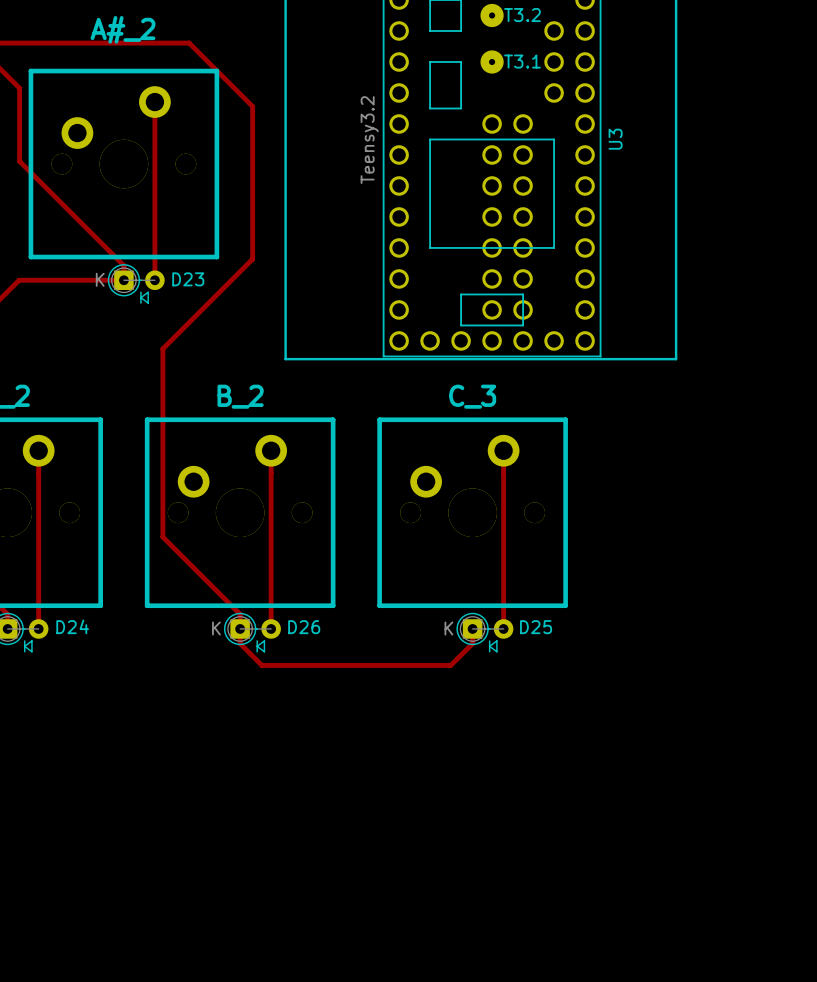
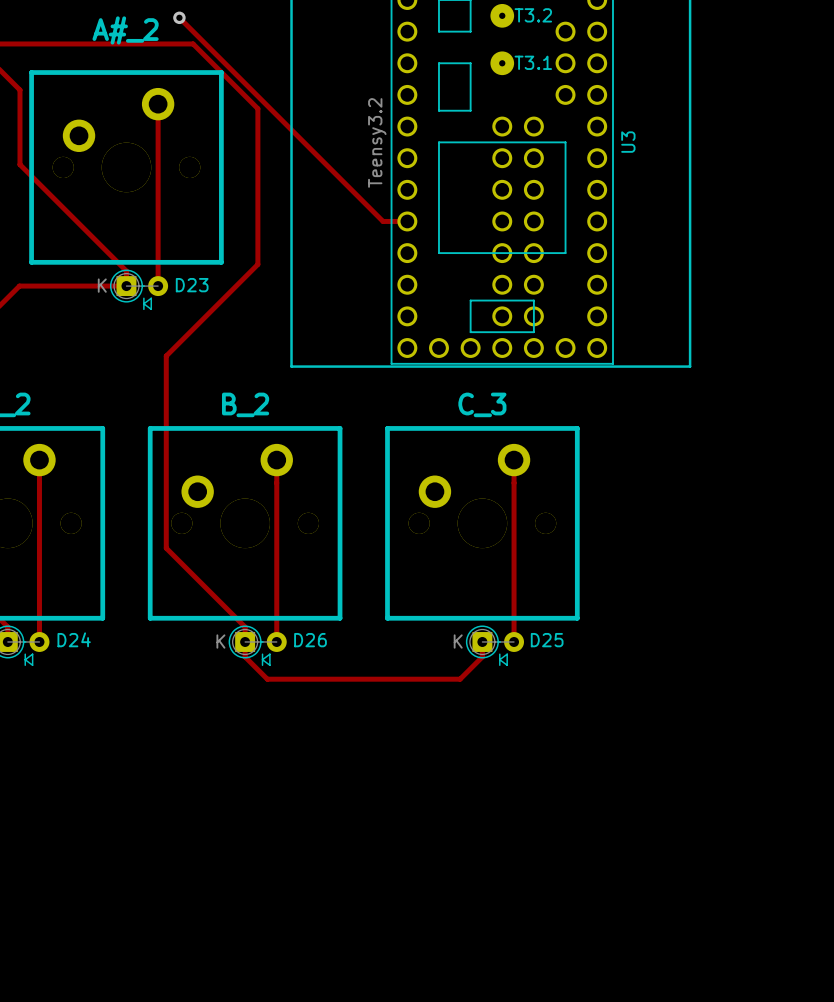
track: none -> (179, 17) (383, 221) (407, 221)
via: none -> (179, 17)

